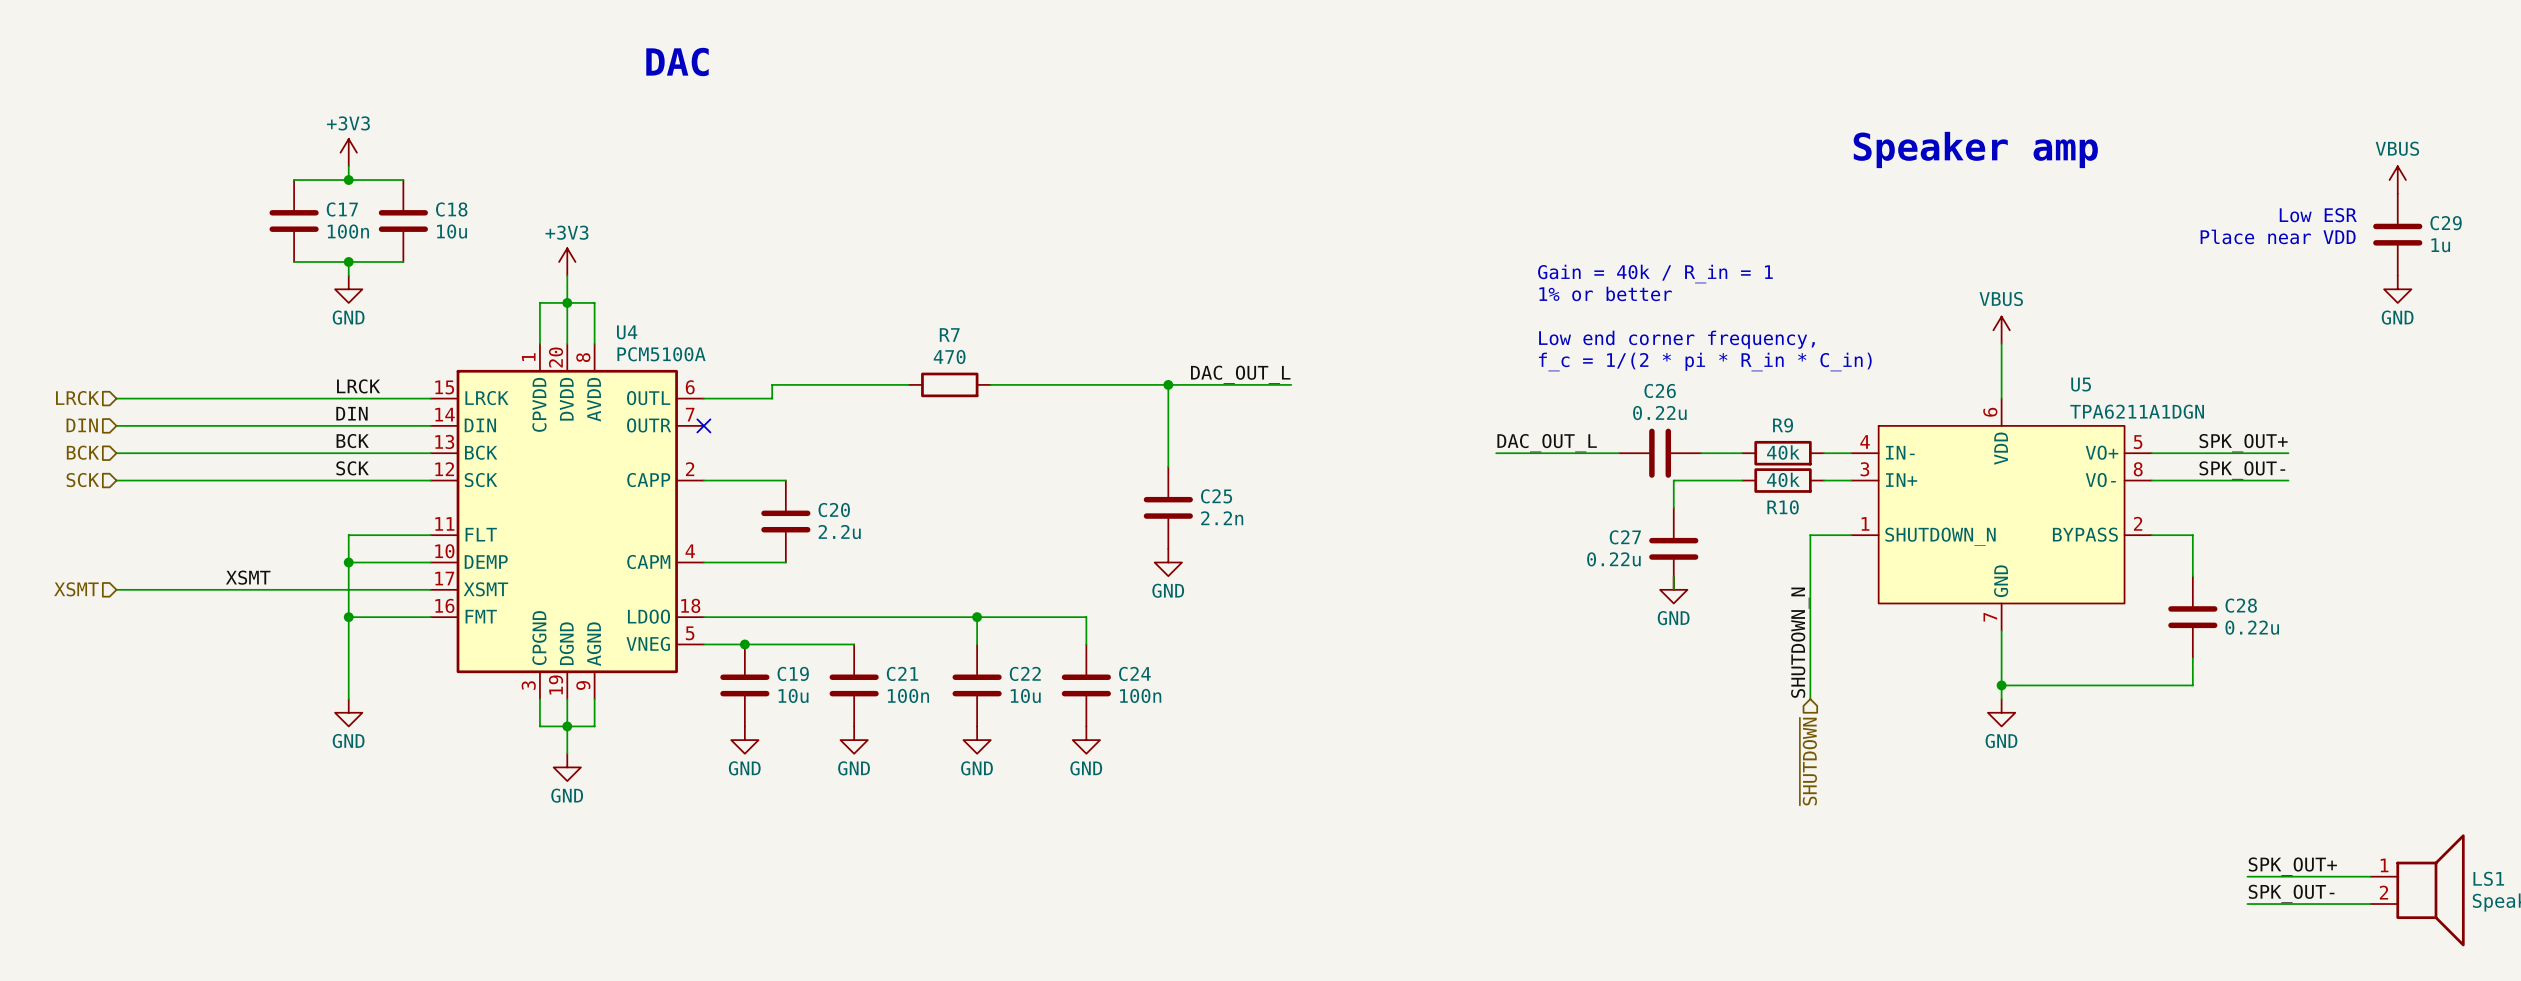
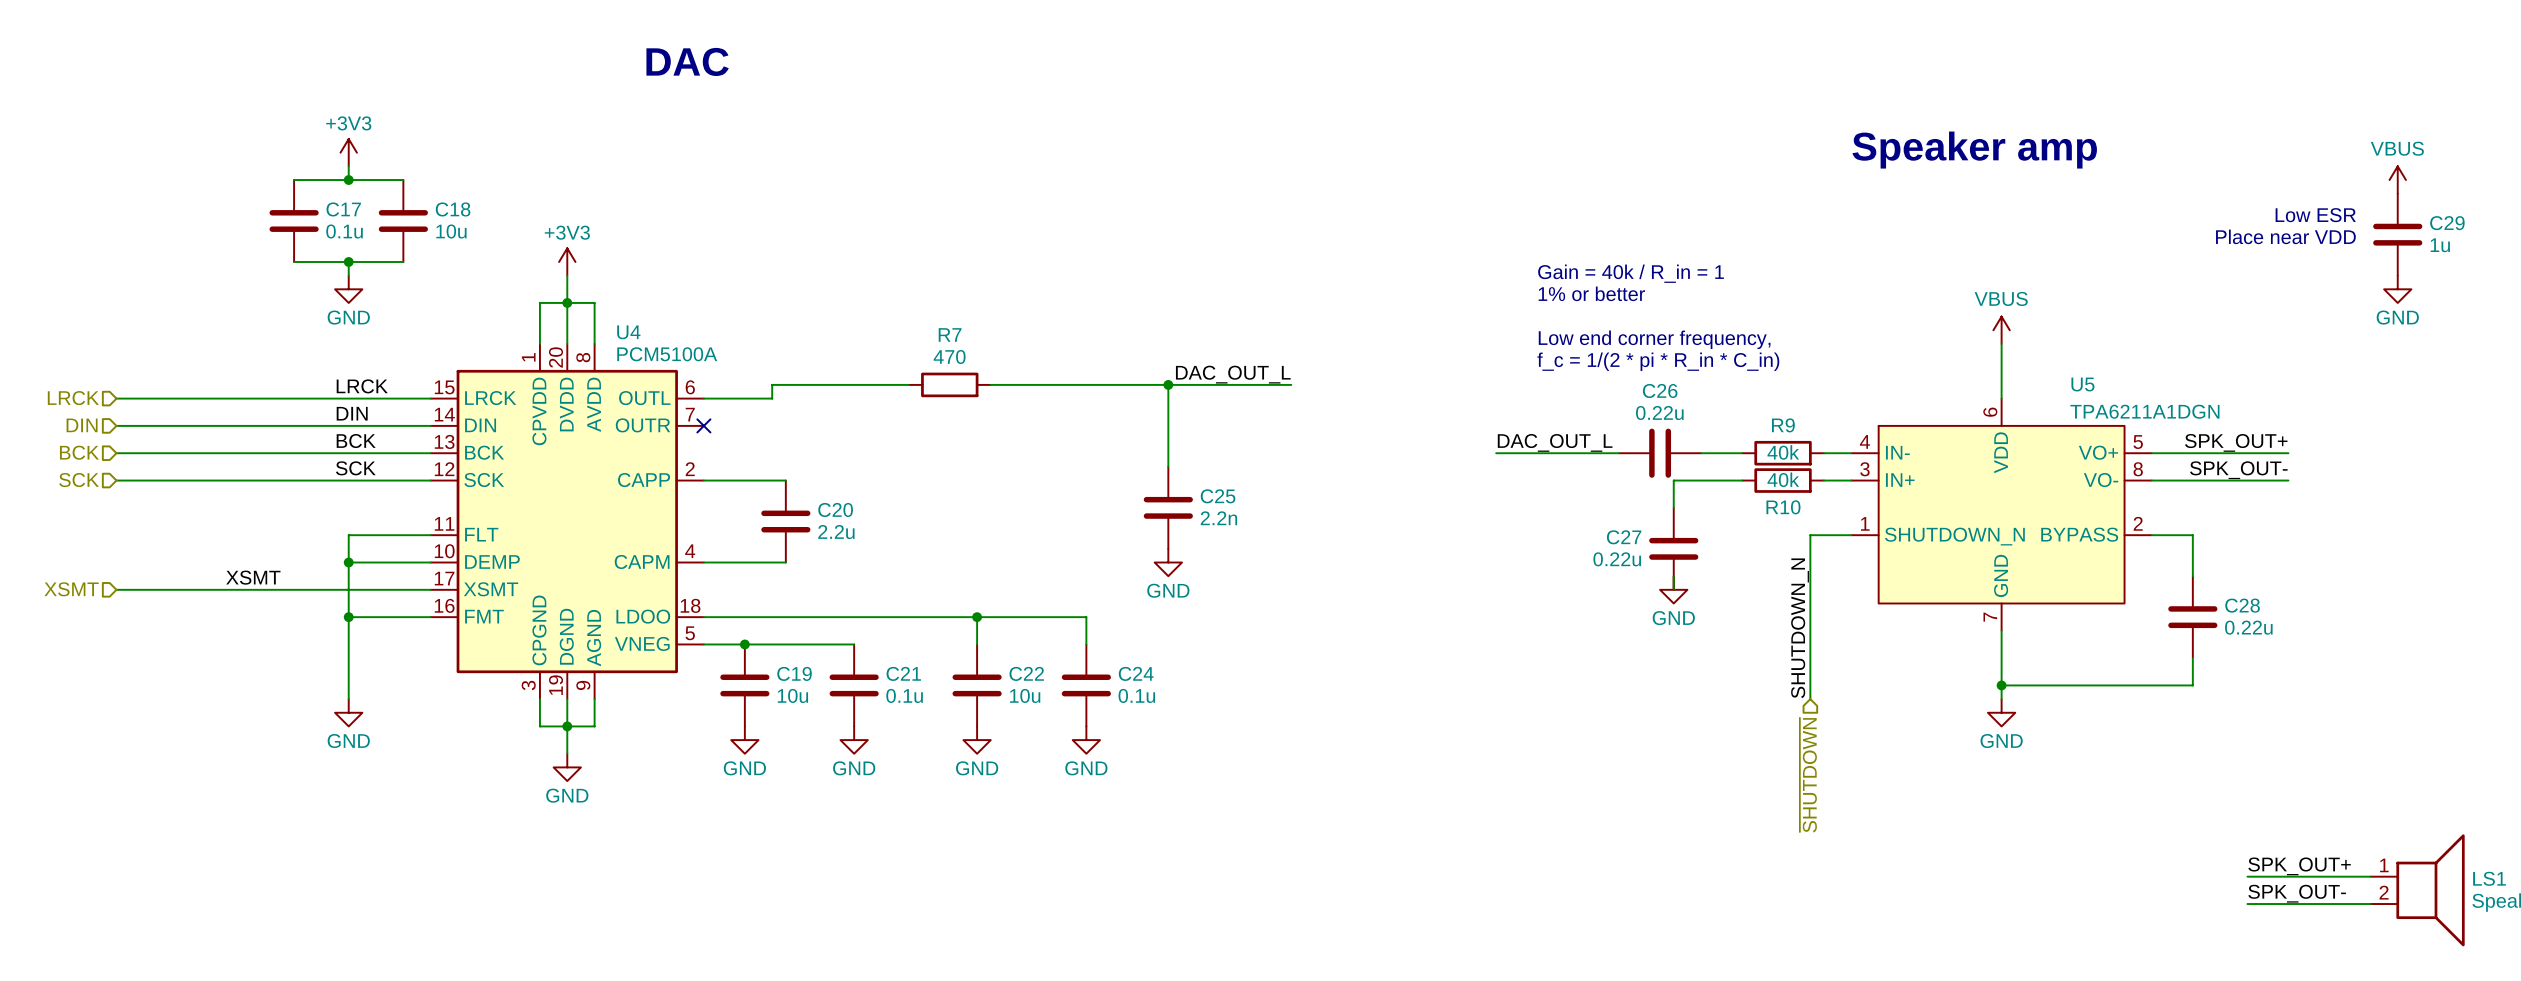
C17 value: 100n (348, 231) -> 0.1u (344, 231)
C21 value: 100n (908, 695) -> 0.1u (904, 695)
C24 value: 100n (1140, 695) -> 0.1u (1136, 695)

